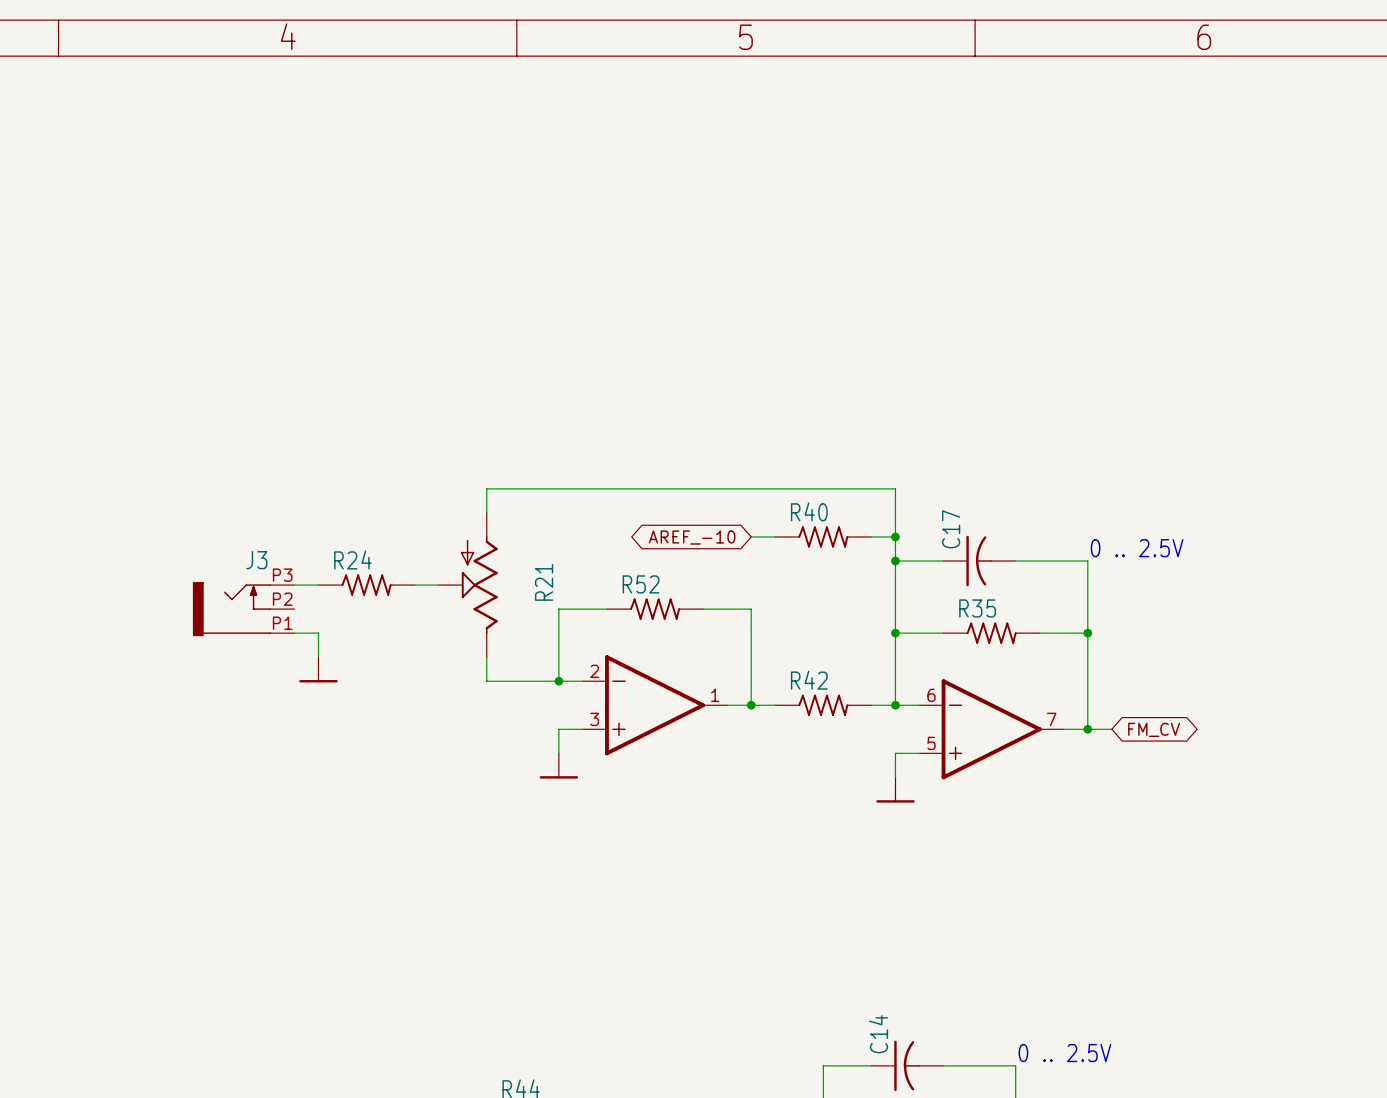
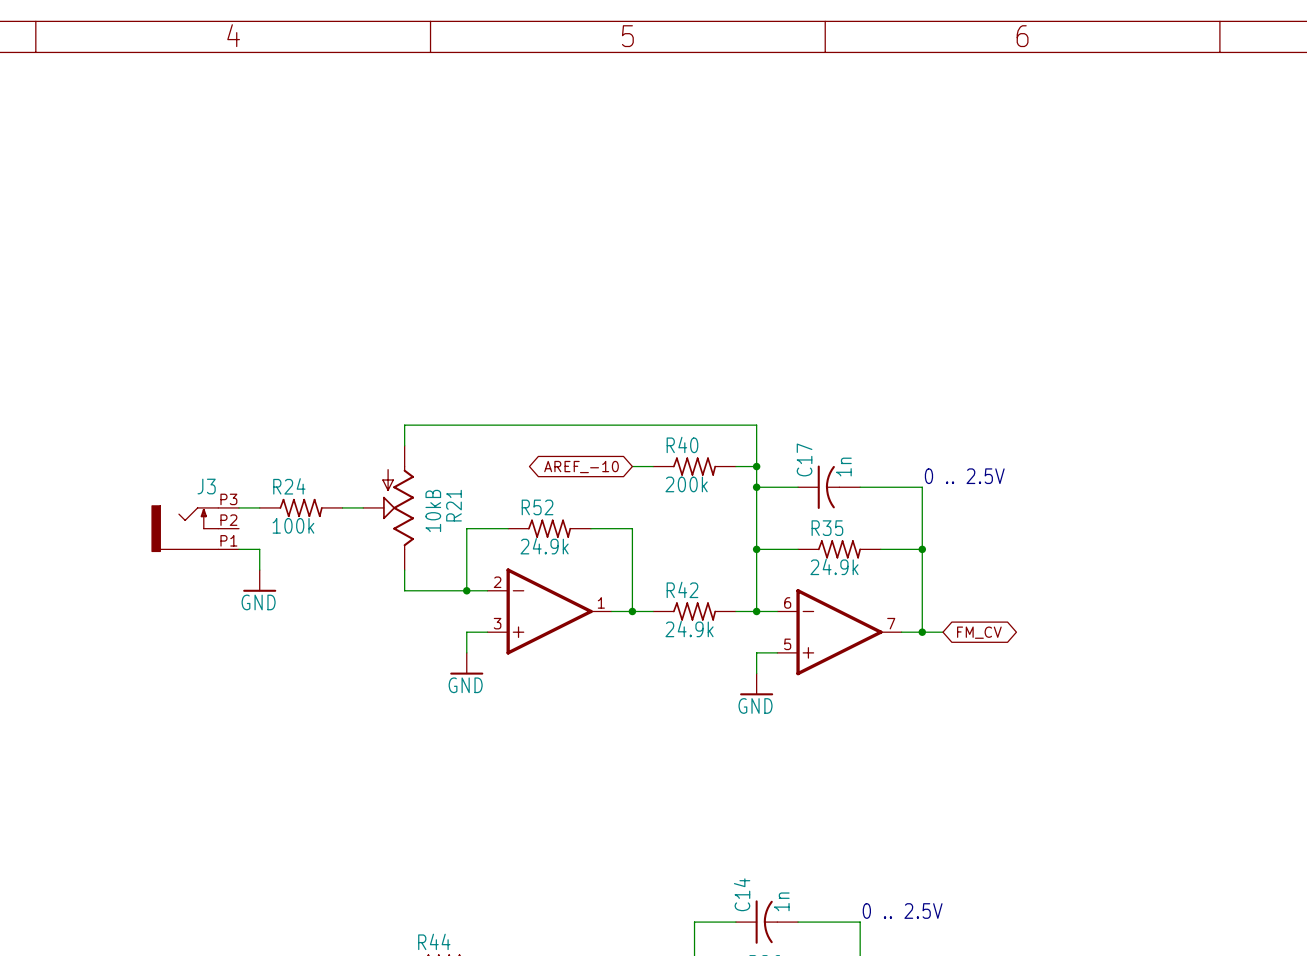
C17 value: none -> 1n (843, 467)
R40 value: none -> 200k (686, 484)
R21 value: none -> 10kB (433, 510)
R24 value: none -> 100k (293, 525)
R52 value: none -> 24.9k (544, 546)
R35 value: none -> 24.9k (834, 566)
power symbol text: none -> GND (258, 602)
R42 value: none -> 24.9k (689, 629)
power symbol text: none -> GND (465, 685)
power symbol text: none -> GND (755, 705)
C14 value: none -> 1n (781, 901)

